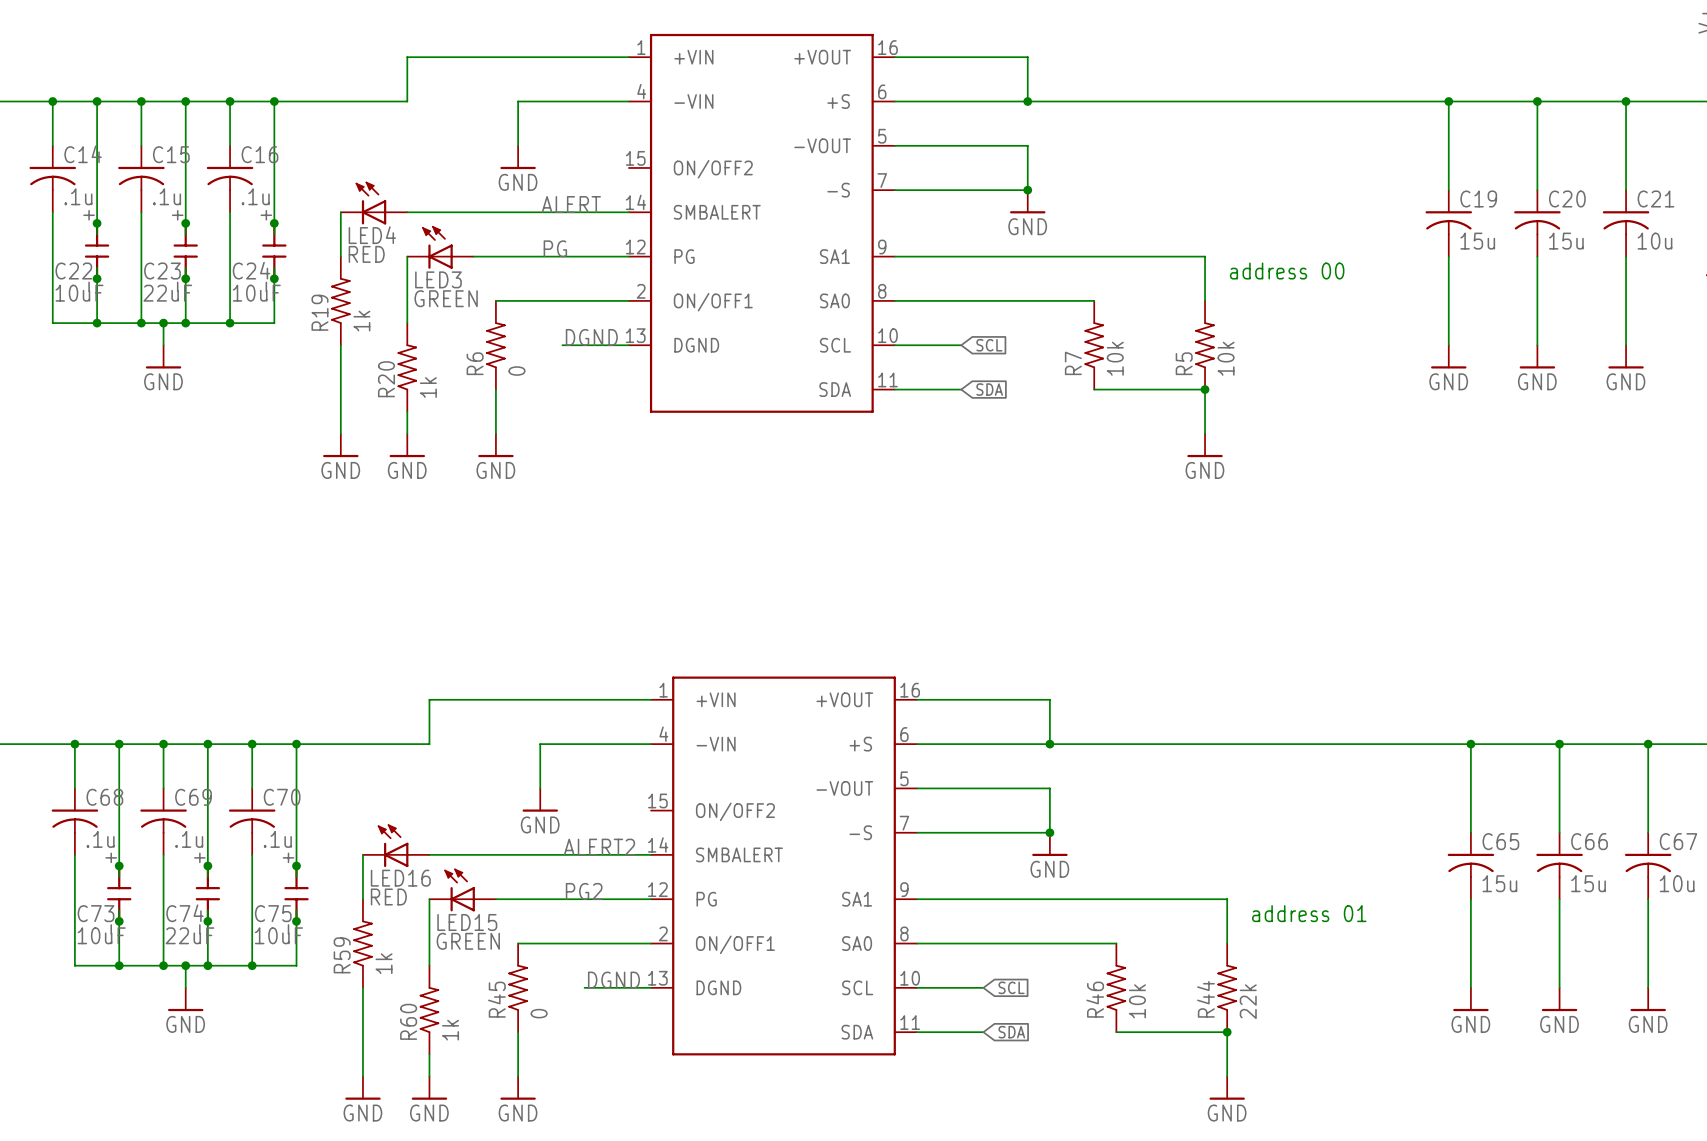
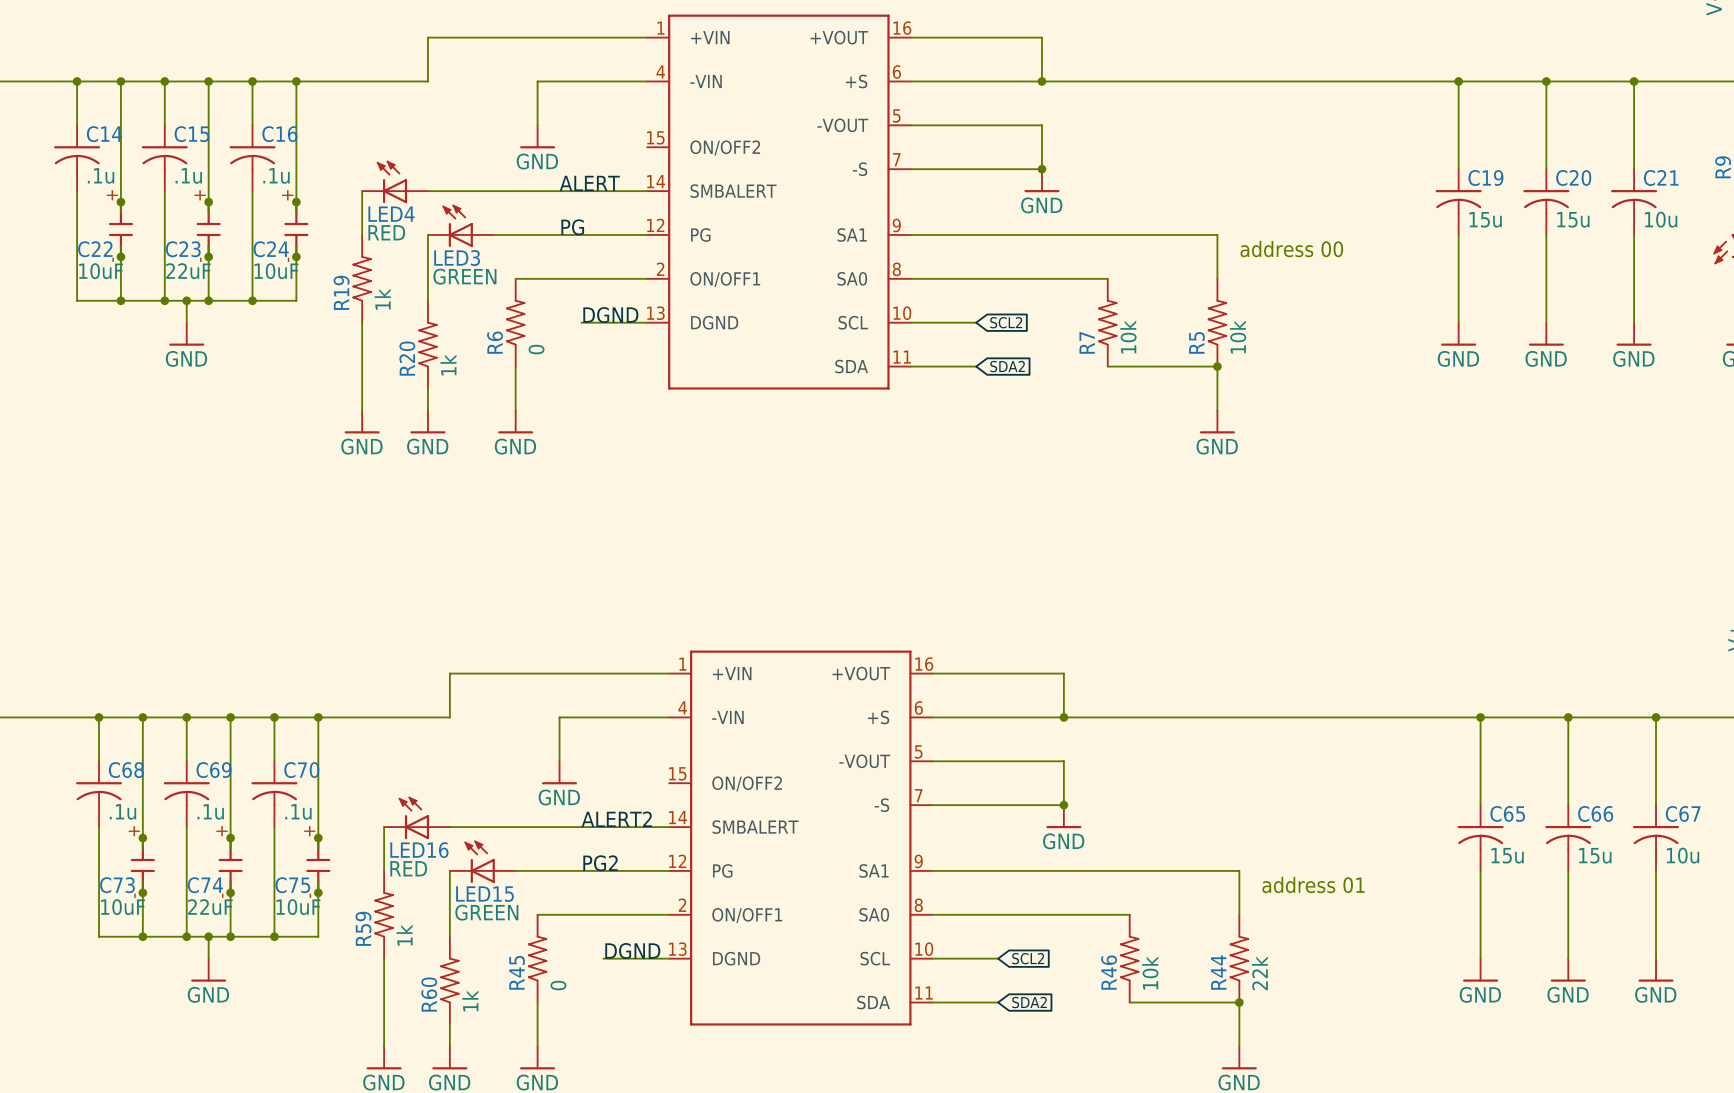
global label: SCL (989, 345) -> SCL2 (1006, 322)
global label: SDA (989, 389) -> SDA2 (1007, 366)
global label: SCL (1011, 987) -> SCL2 (1028, 958)
global label: SDA (1011, 1032) -> SDA2 (1029, 1002)

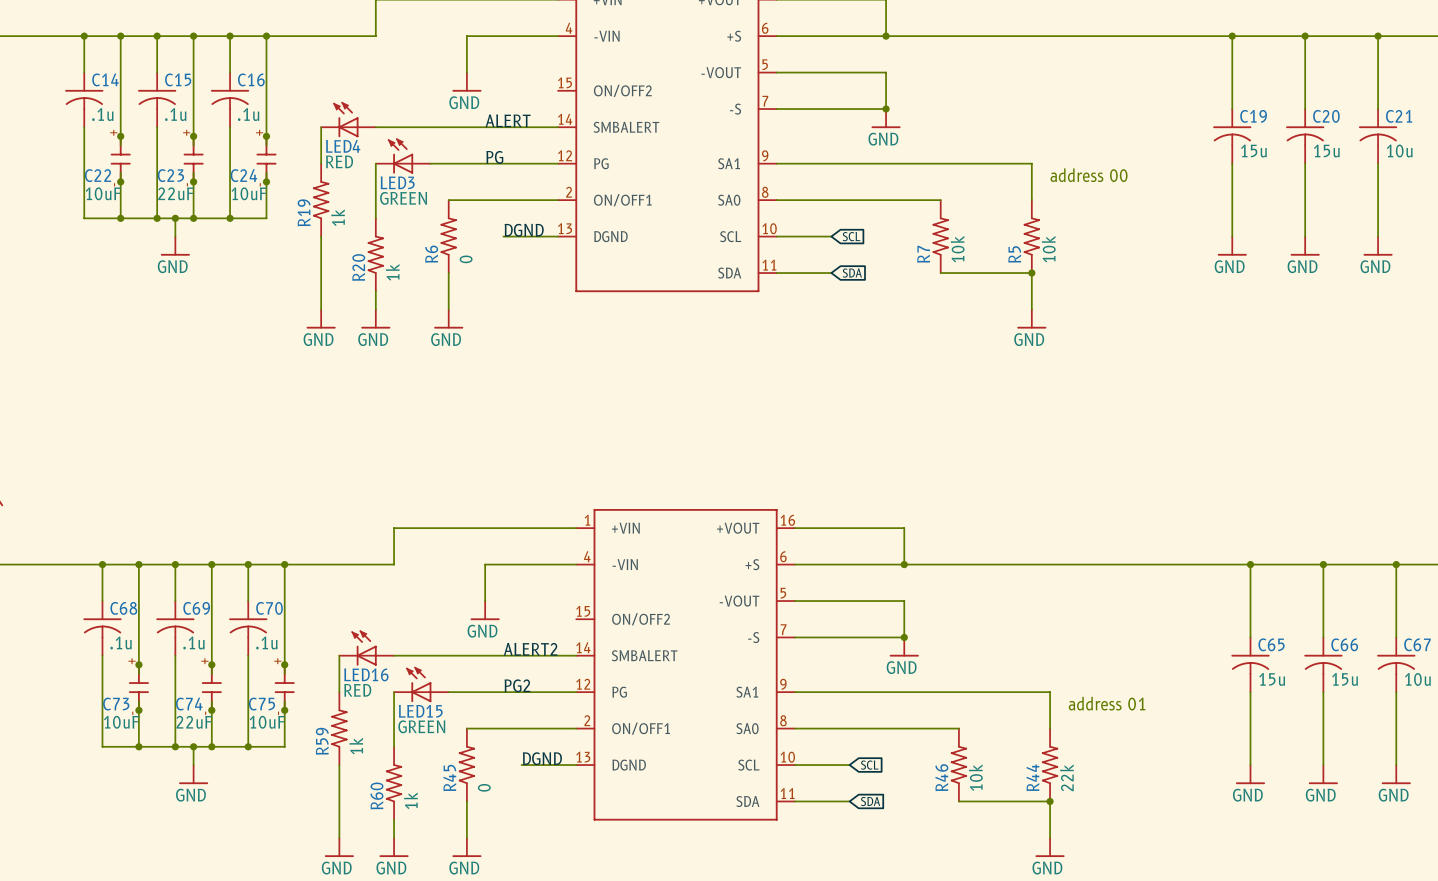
global label: SCL2 (1006, 322) -> SCL (851, 236)
global label: SDA2 (1007, 366) -> SDA (852, 273)
global label: SCL2 (1028, 958) -> SCL (869, 765)
global label: SDA2 (1029, 1002) -> SDA (870, 801)

